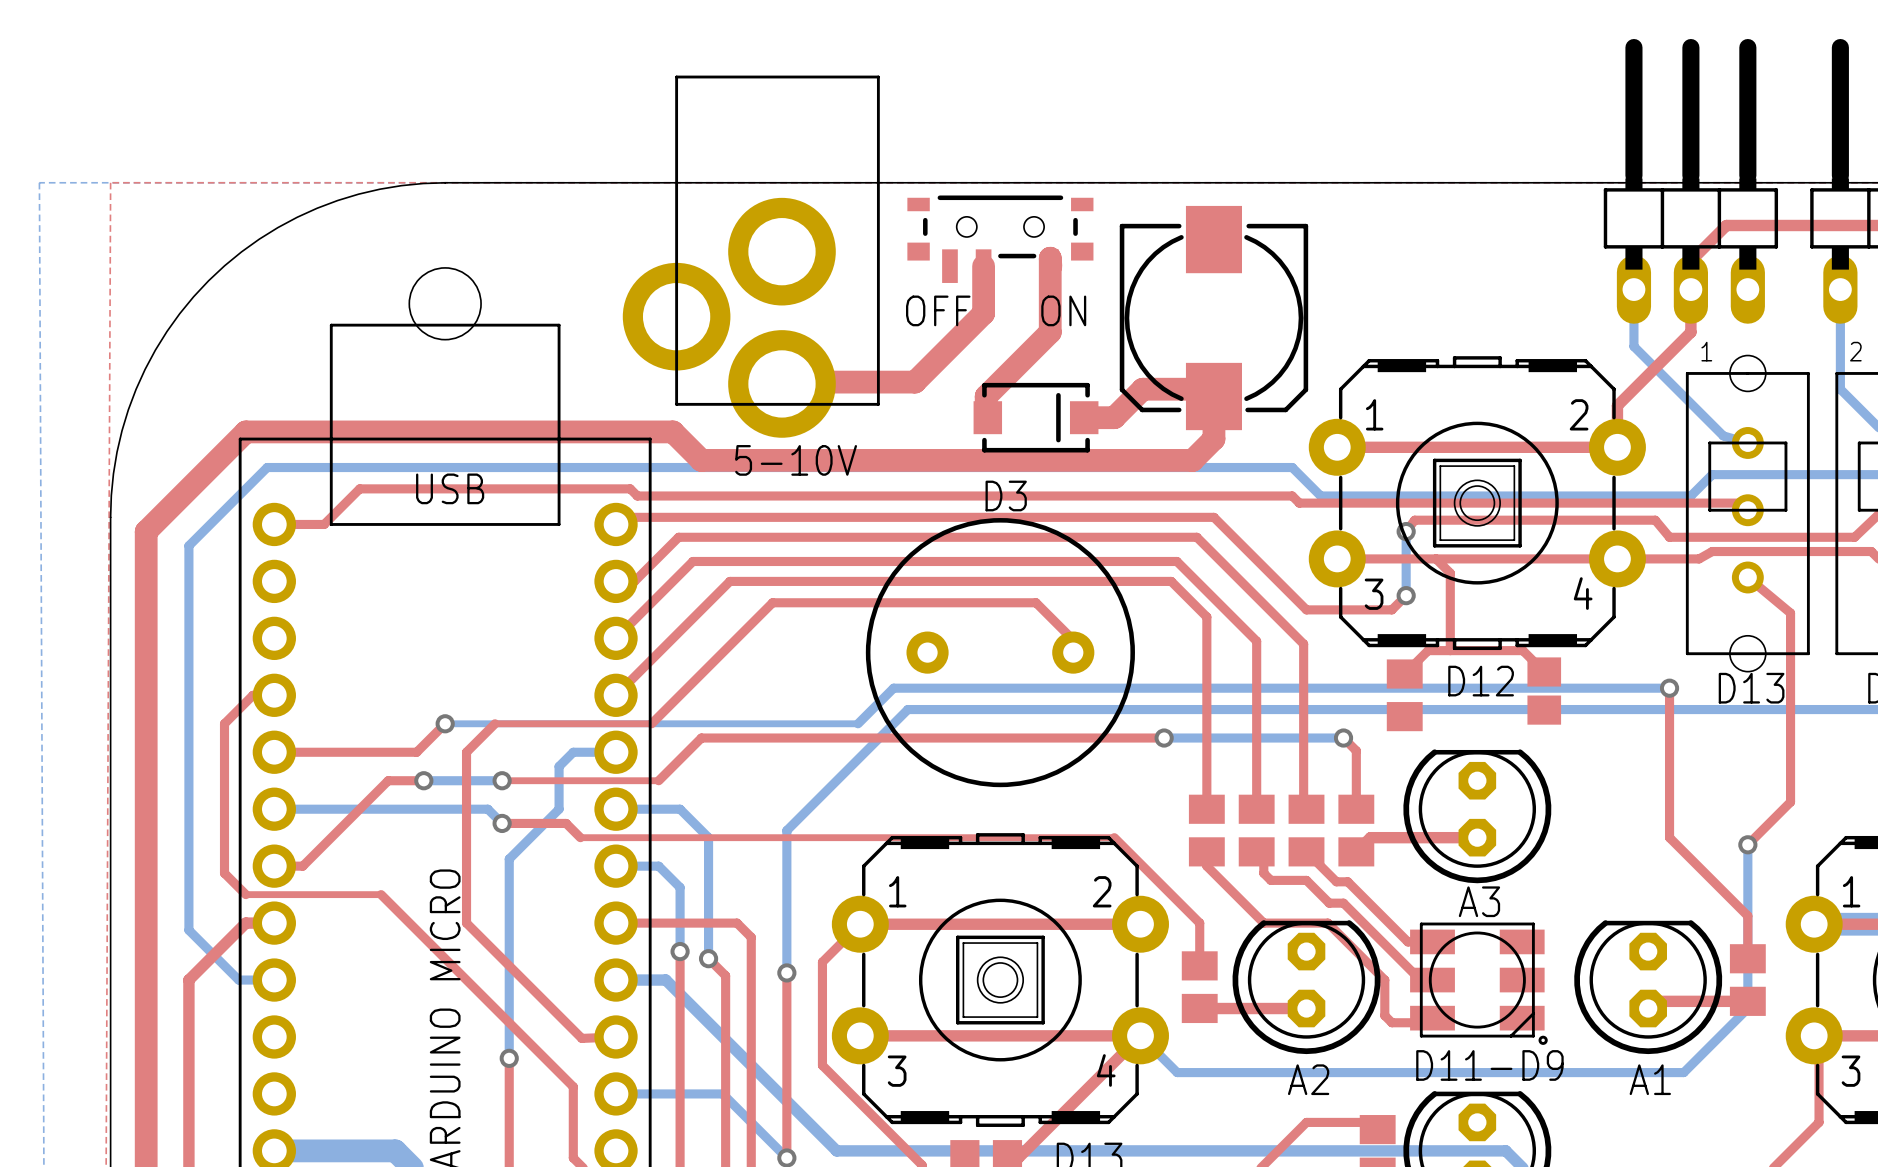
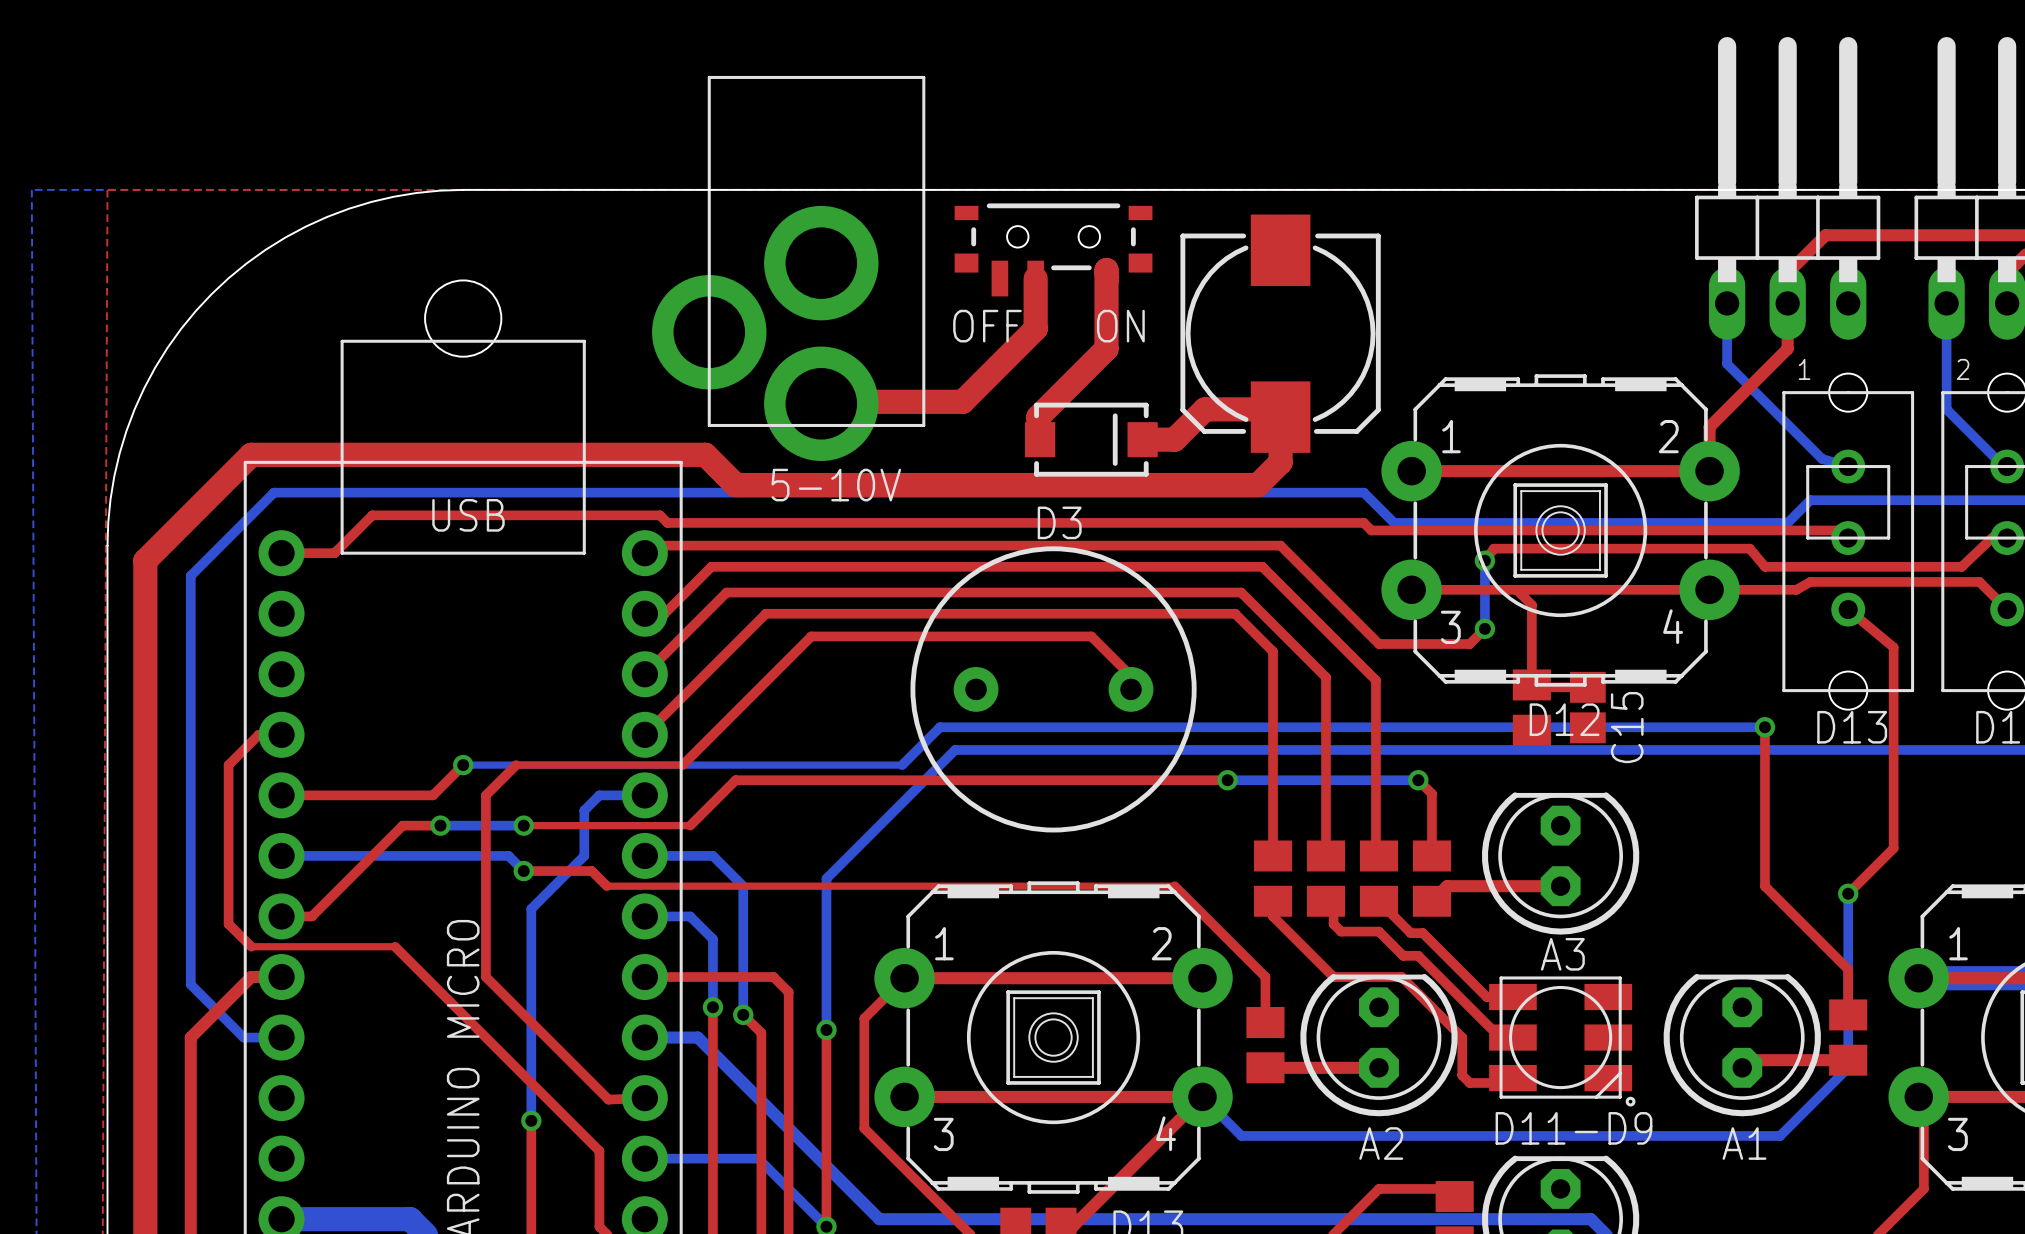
top track: (1452, 650) (1428, 650) (1404, 674) -> none
top track: (1502, 650) (1522, 650) (1544, 671) -> none
C15: none -> (1587, 707)
part: (1544, 691) -> none
part position: (1404, 695) -> (1531, 707)

